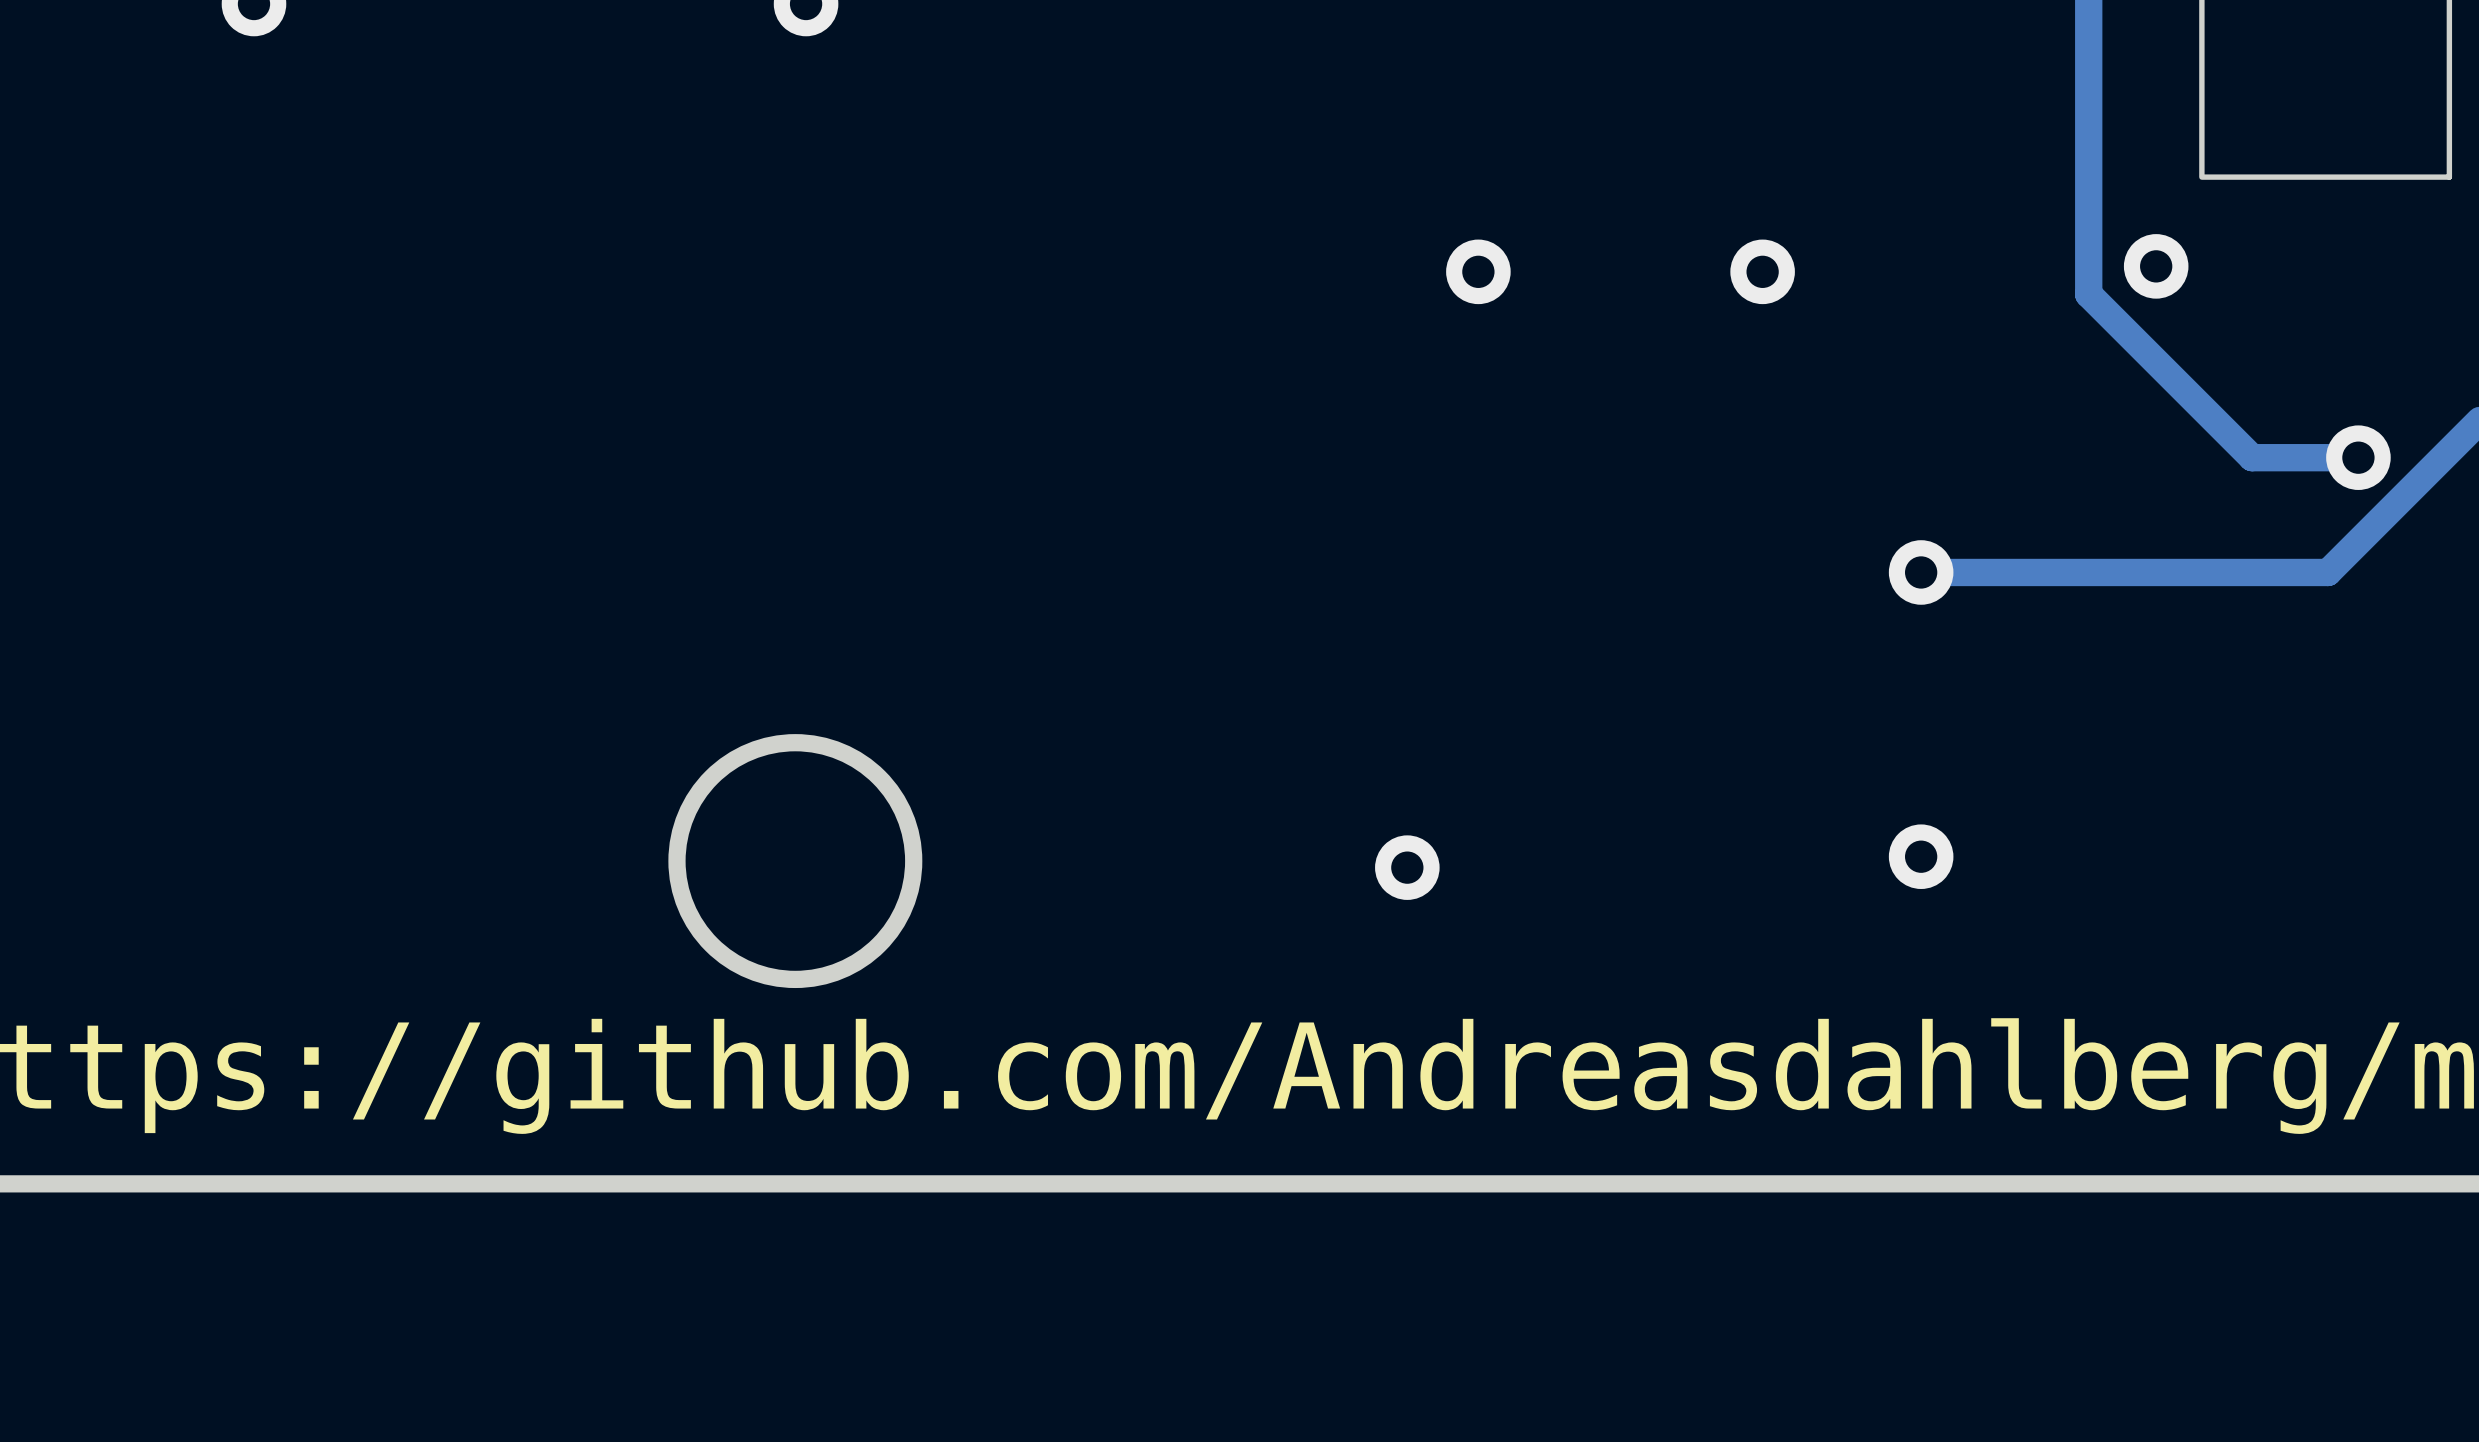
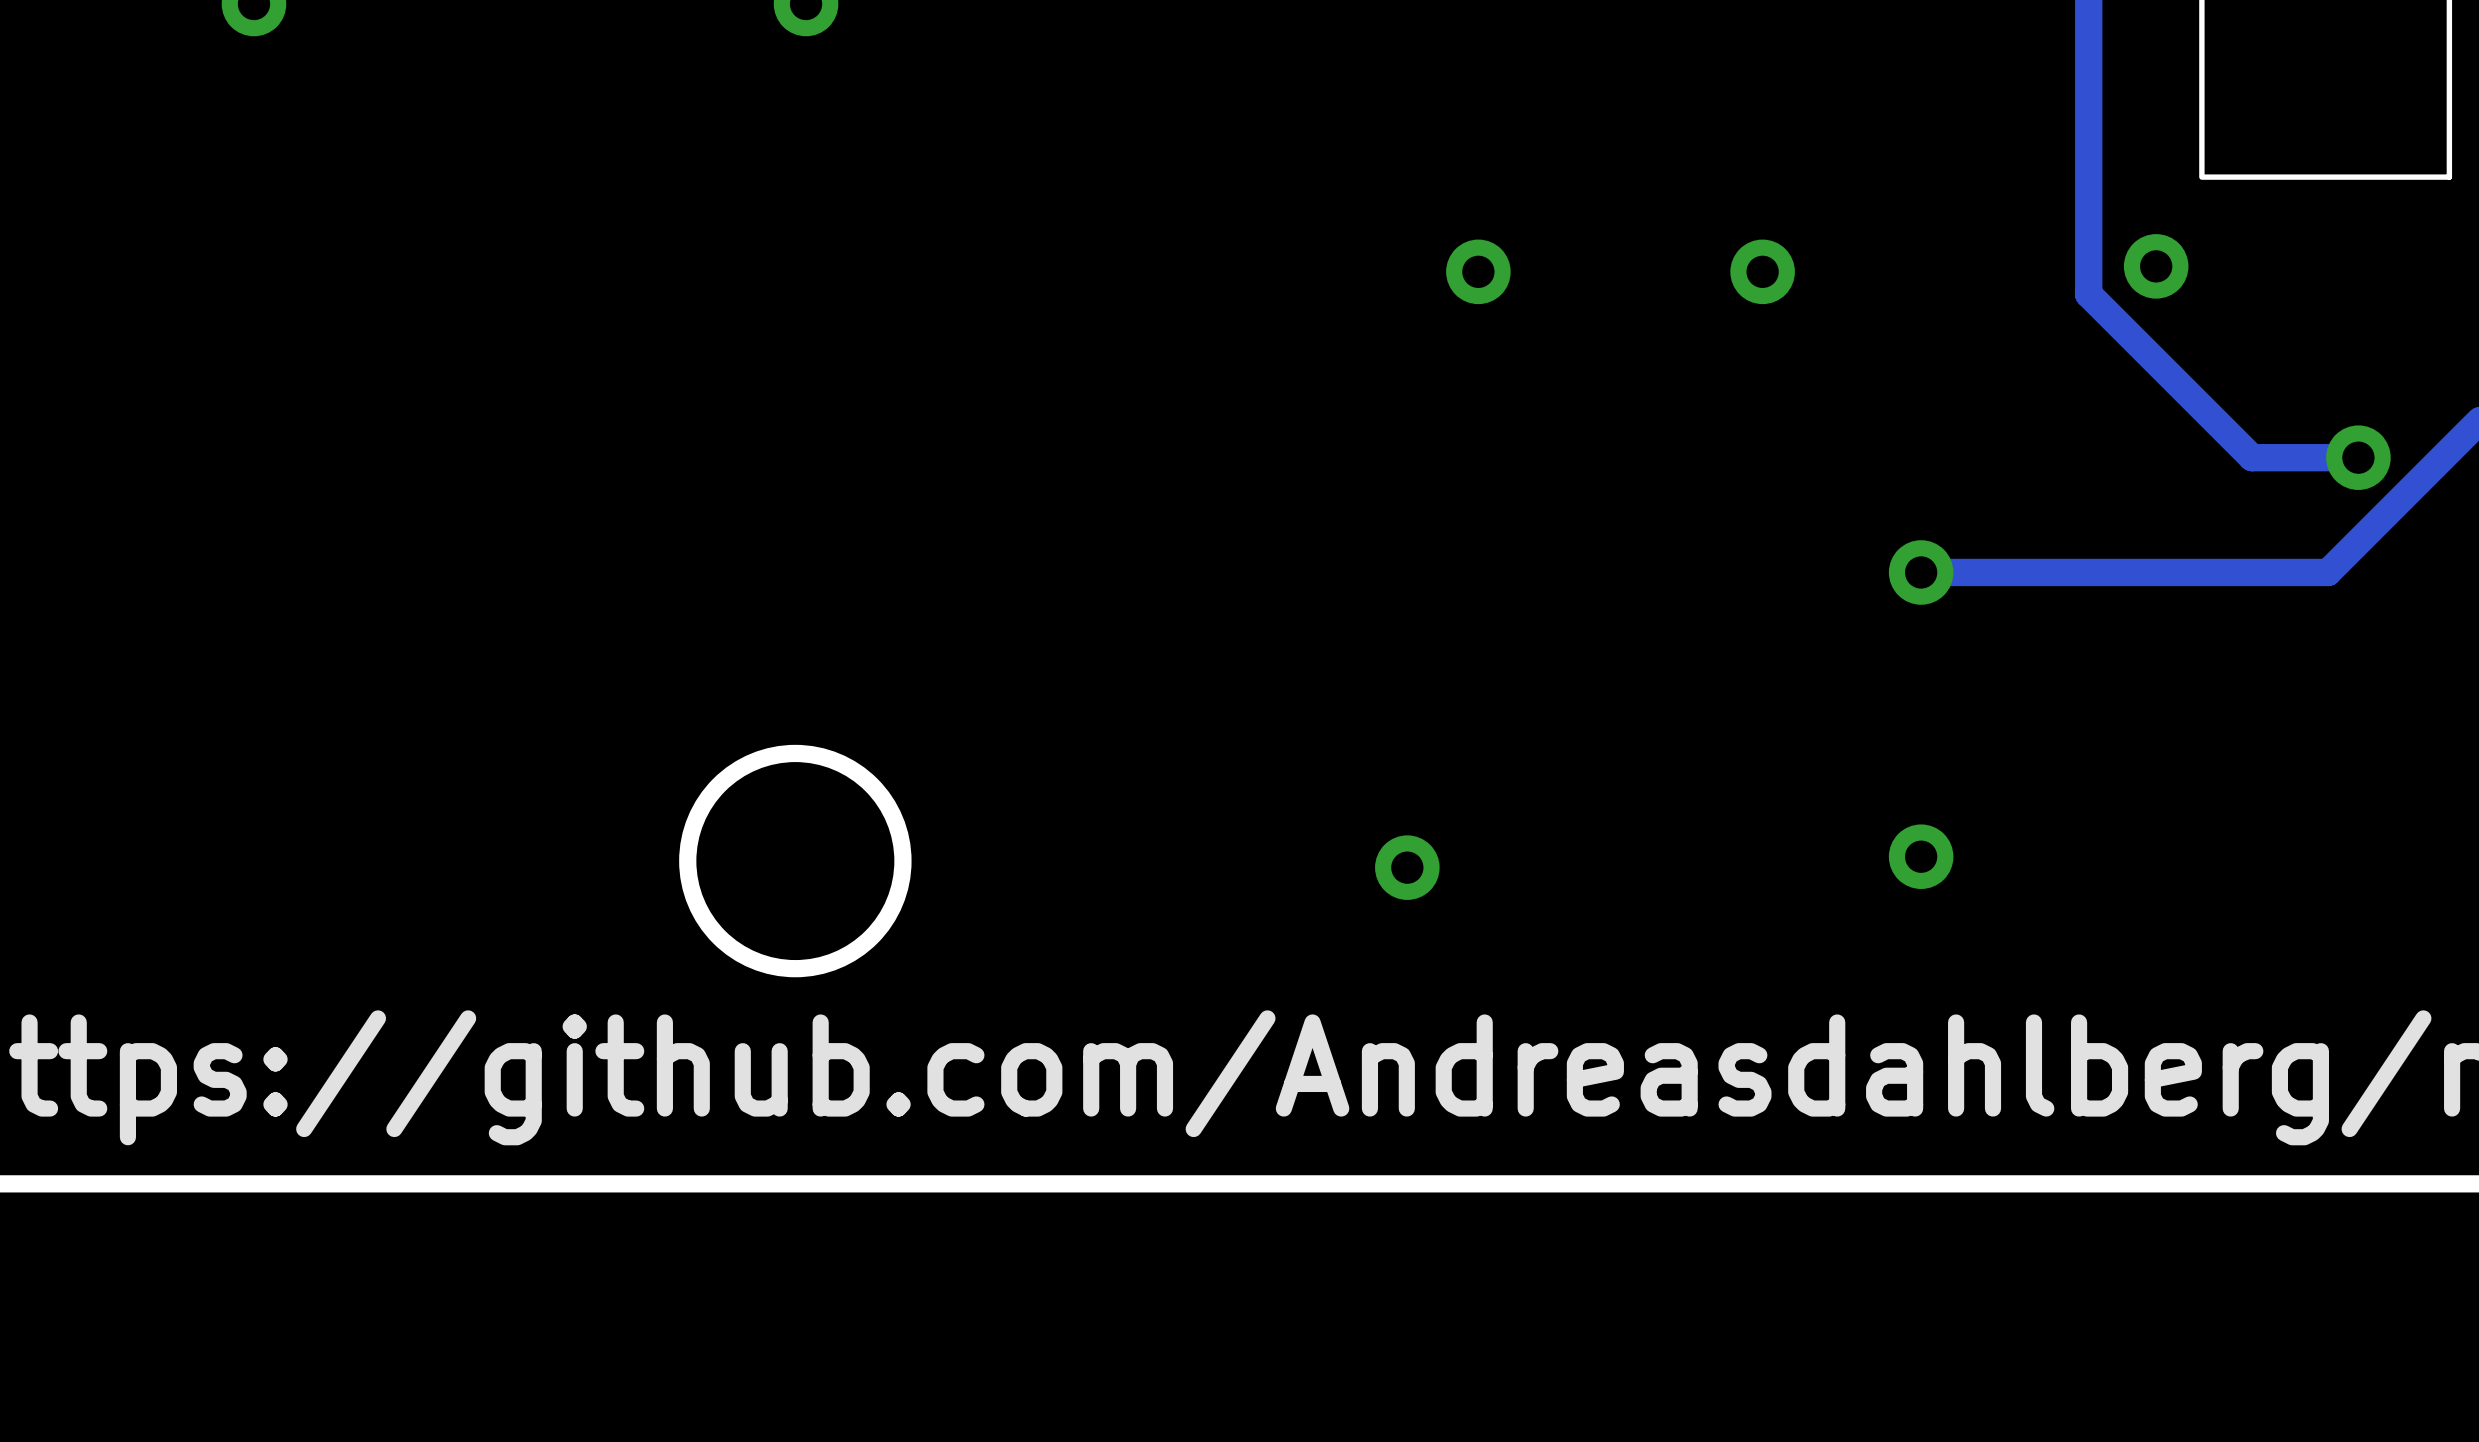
round board edge size: [668, 734, 923, 989] -> [679, 744, 912, 978]

